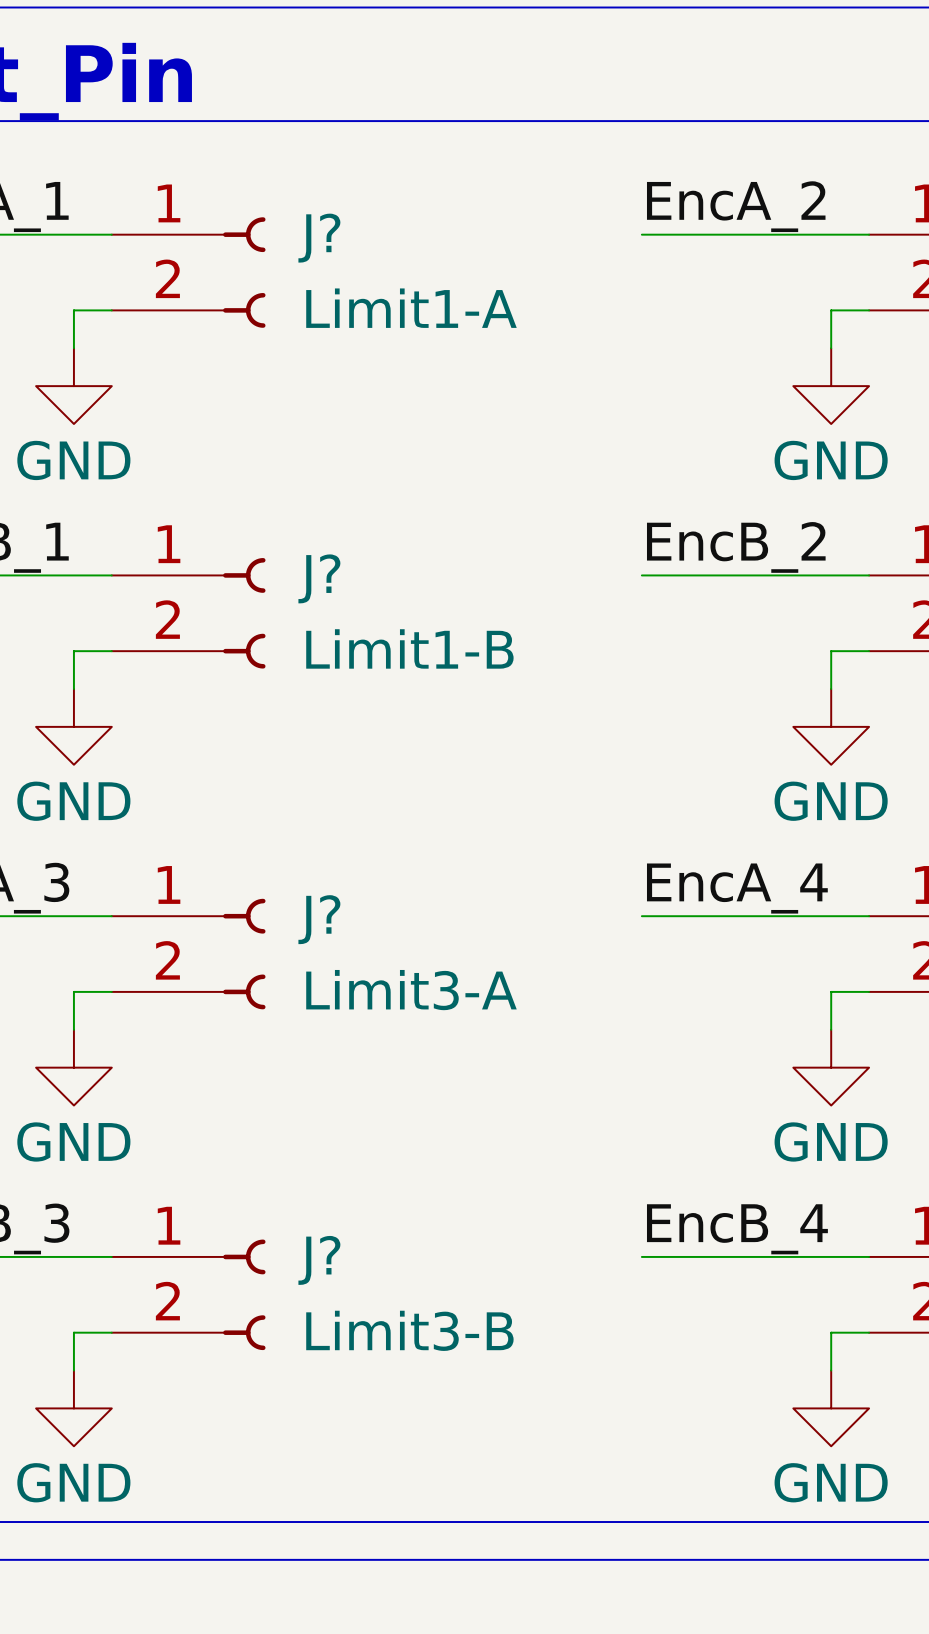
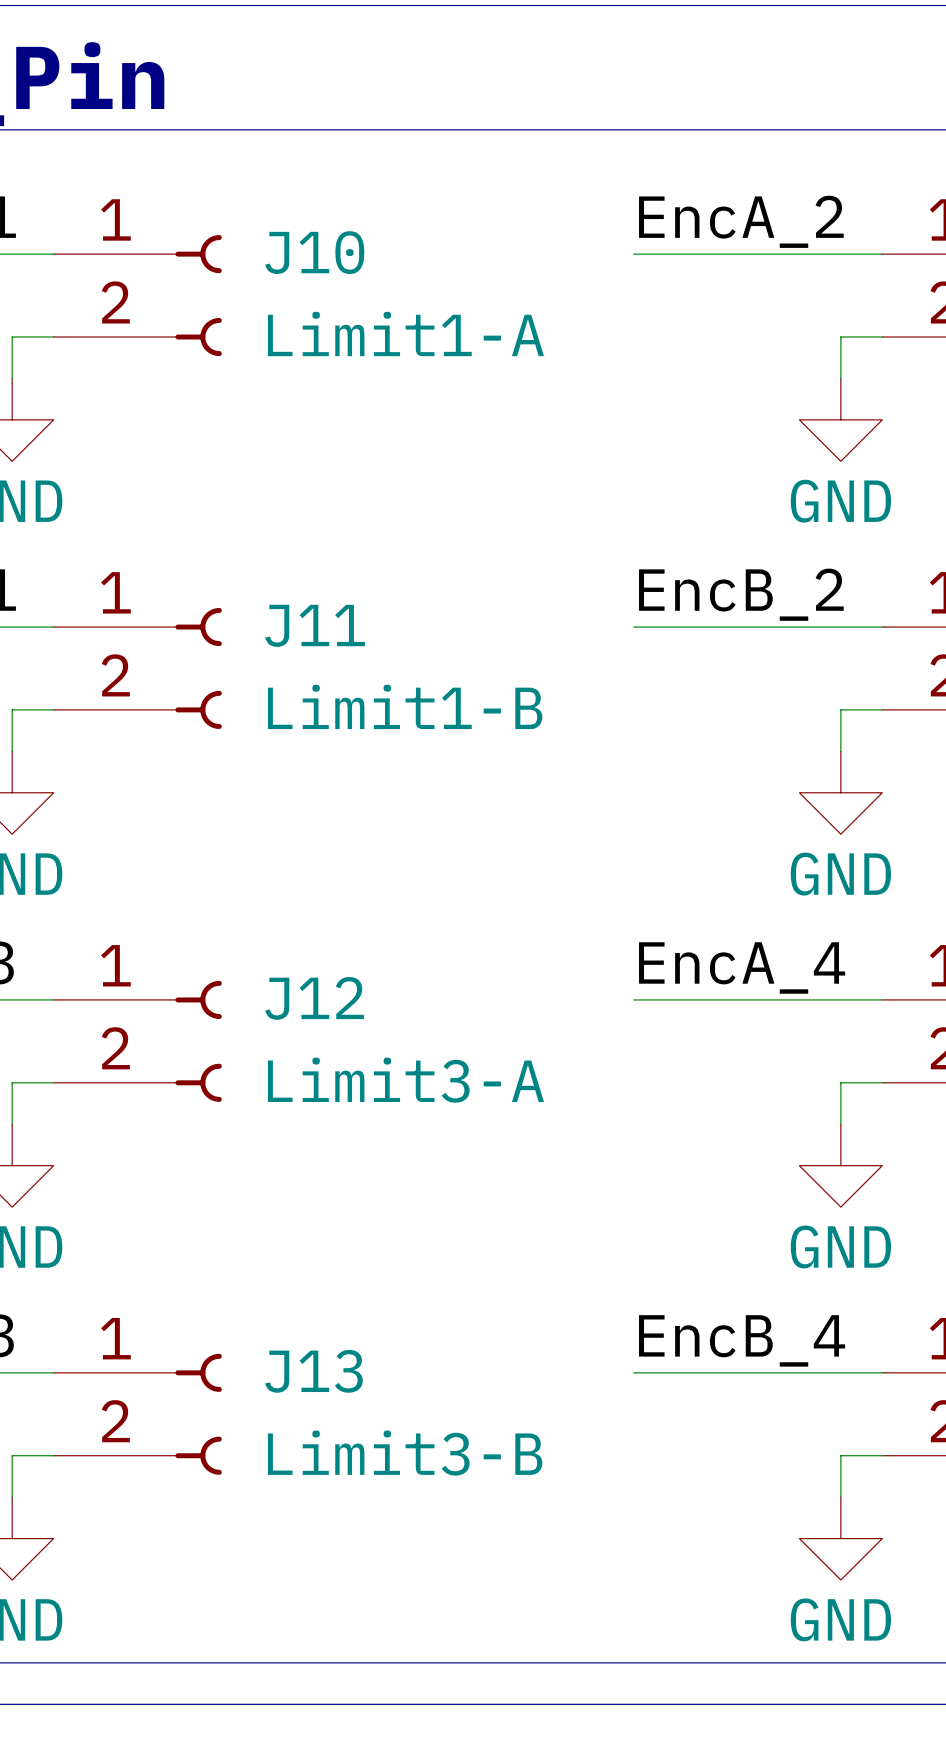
J? name: J? (319, 238) -> J10 (314, 252)
J? name: J? (319, 578) -> J11 (315, 625)
J? name: J? (319, 919) -> J12 (314, 998)
J? name: J? (319, 1260) -> J13 (313, 1371)

